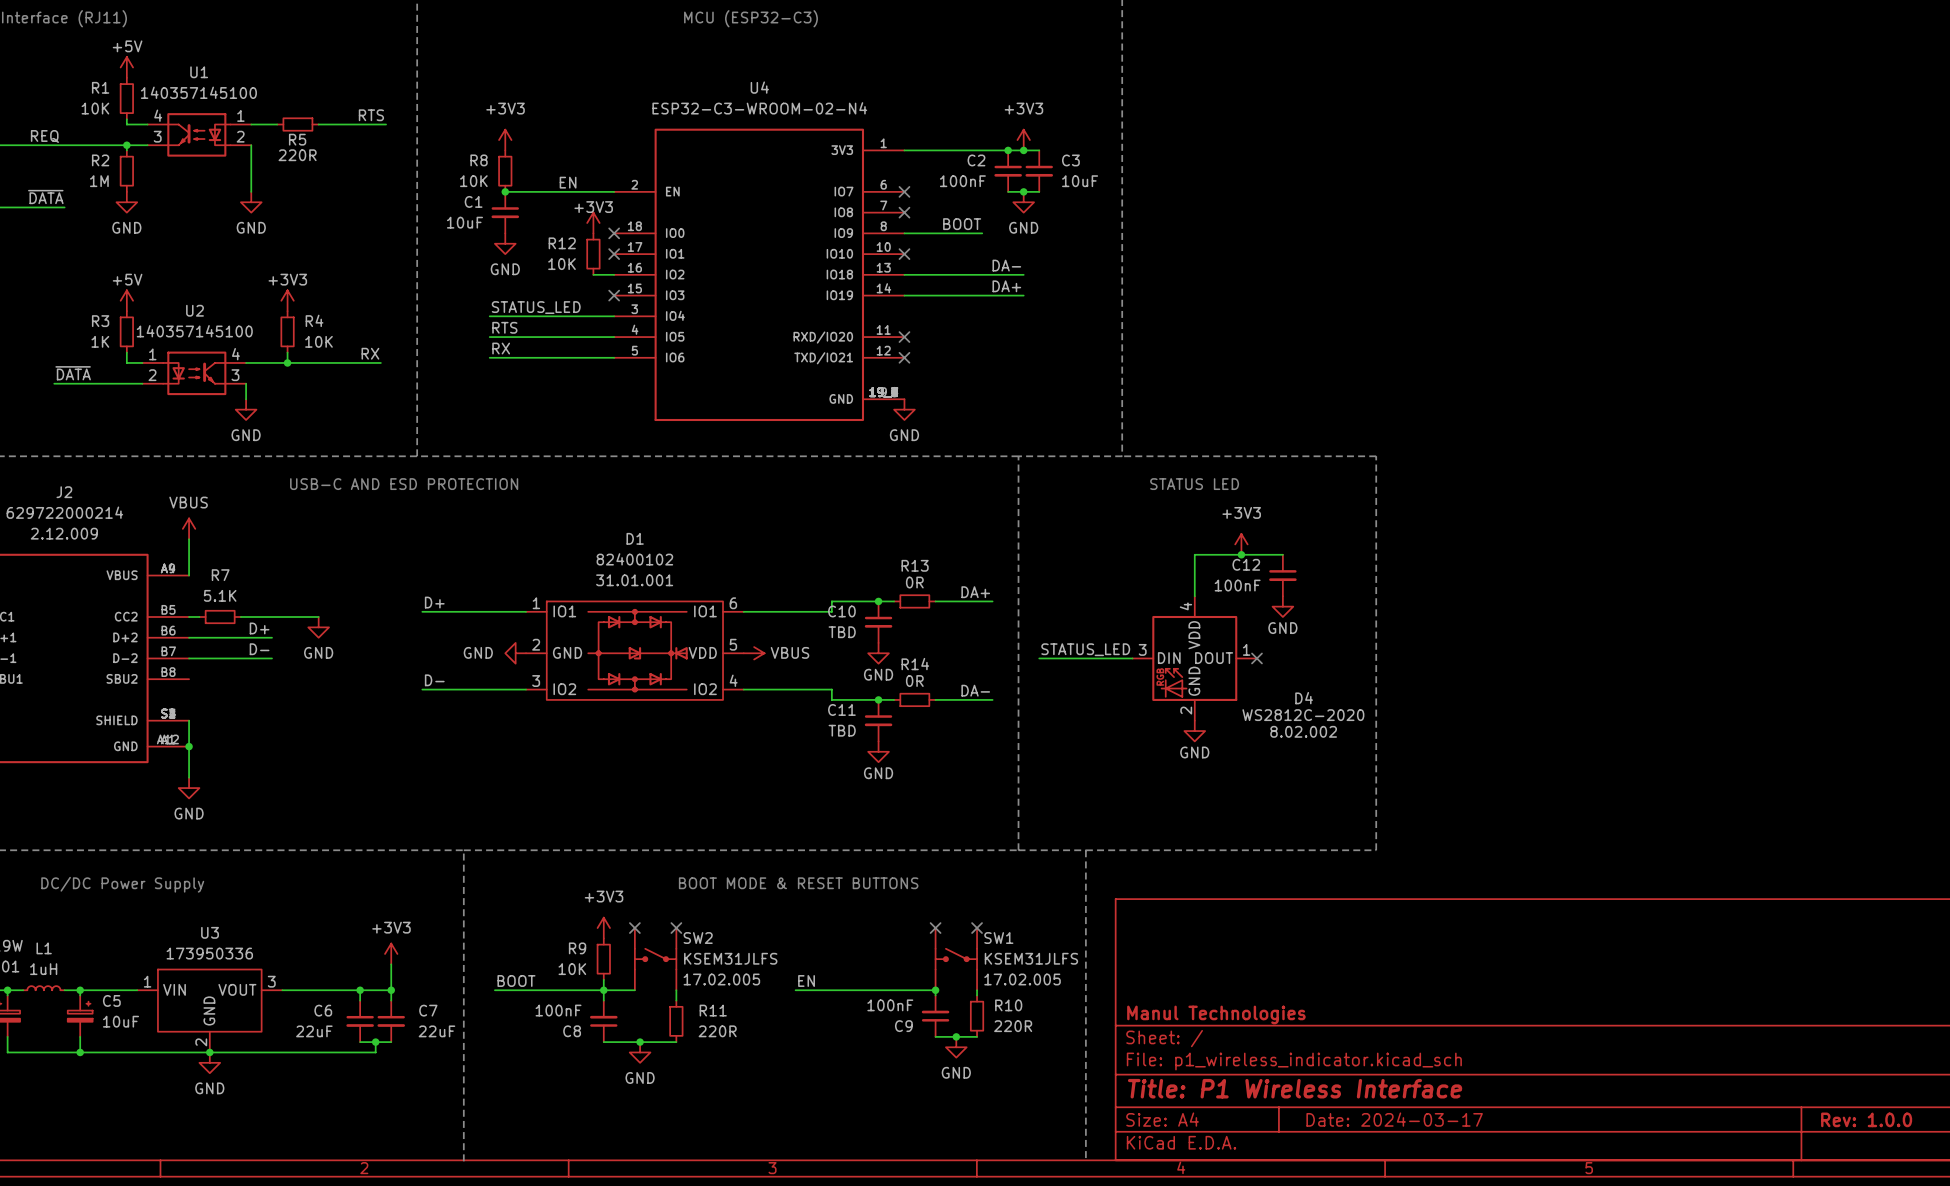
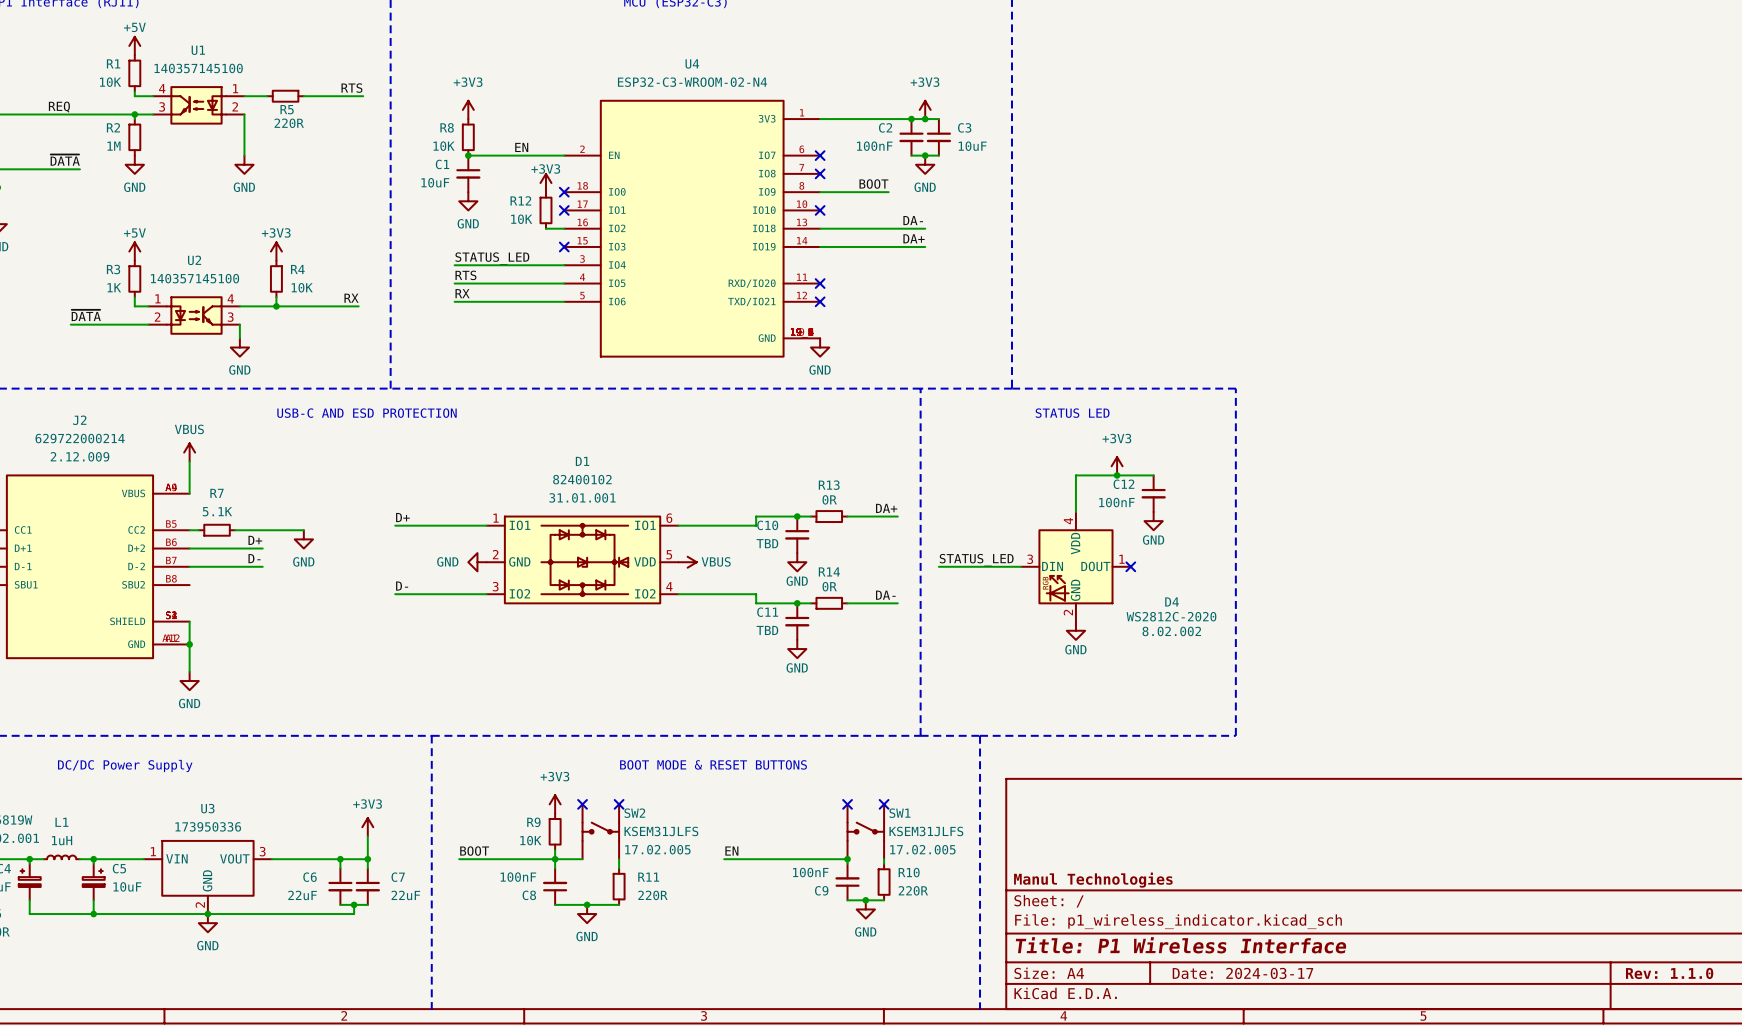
title block: Rev: 1.0.0 (1866, 1119) -> Rev: 1.1.0 (1669, 973)

